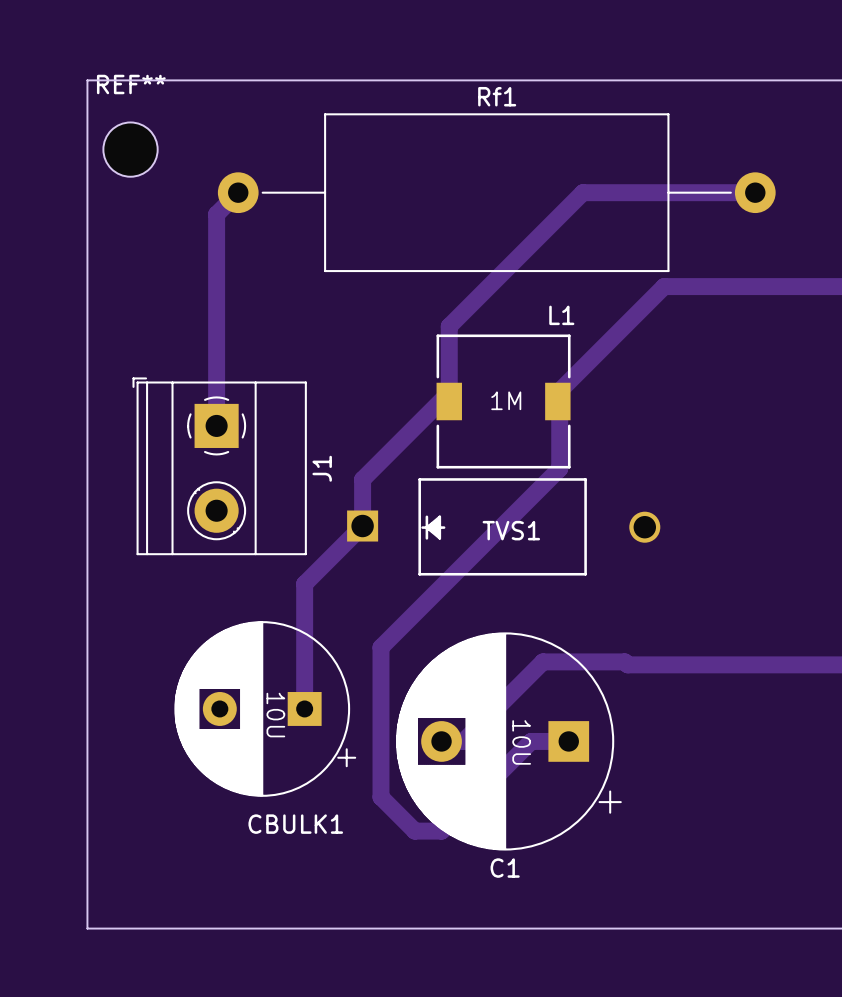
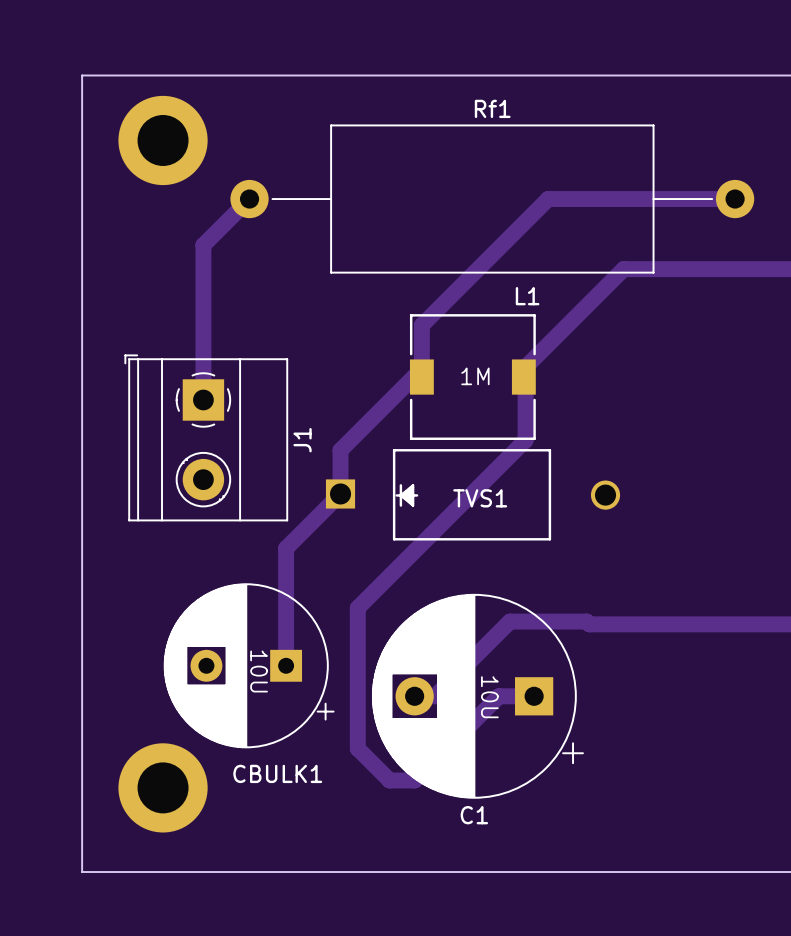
REF**: (130, 149) -> none
part: none -> (163, 140)
track: (238, 192) (216, 214) (216, 261) -> (249, 199) (203, 245)
Rf1 position: (496, 192) -> (492, 199)
track: (755, 192) (582, 192) (449, 326) (449, 346) -> (735, 199) (548, 199) (421, 325)
part: none -> (163, 787)

